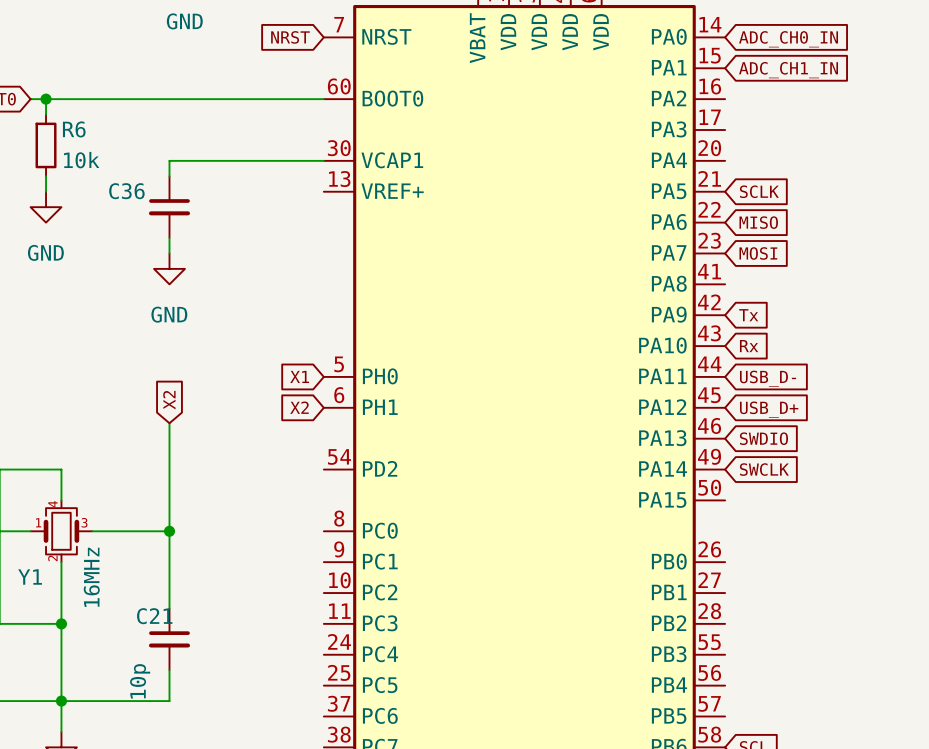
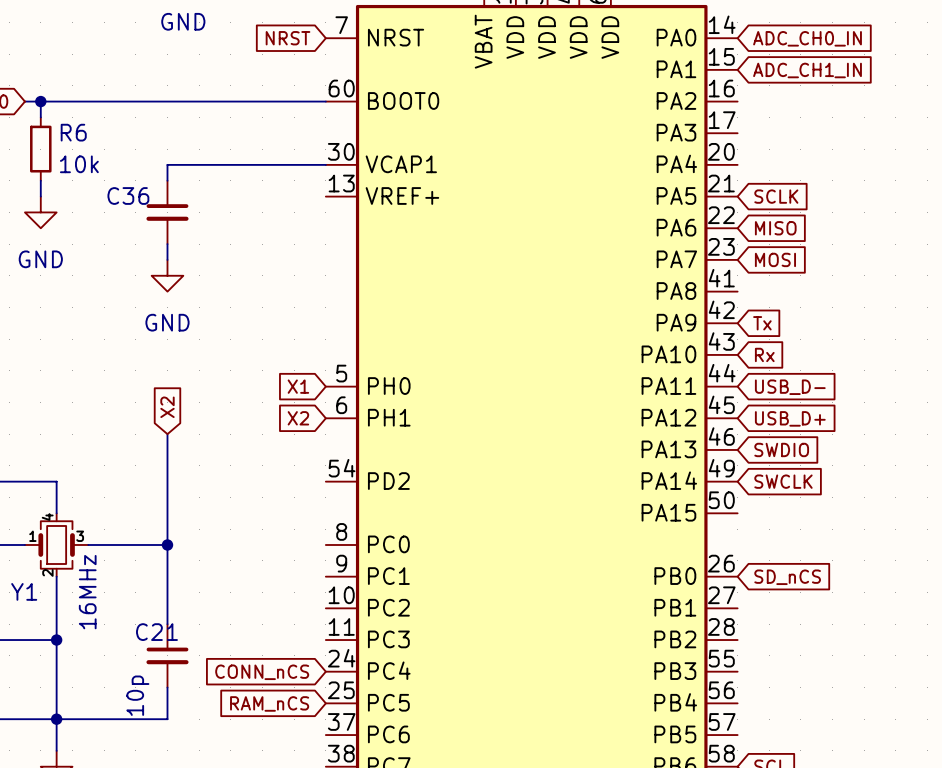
global label: none -> SD_nCS (787, 577)
global label: none -> CONN_nCS (262, 672)
global label: none -> RAM_nCS (269, 703)

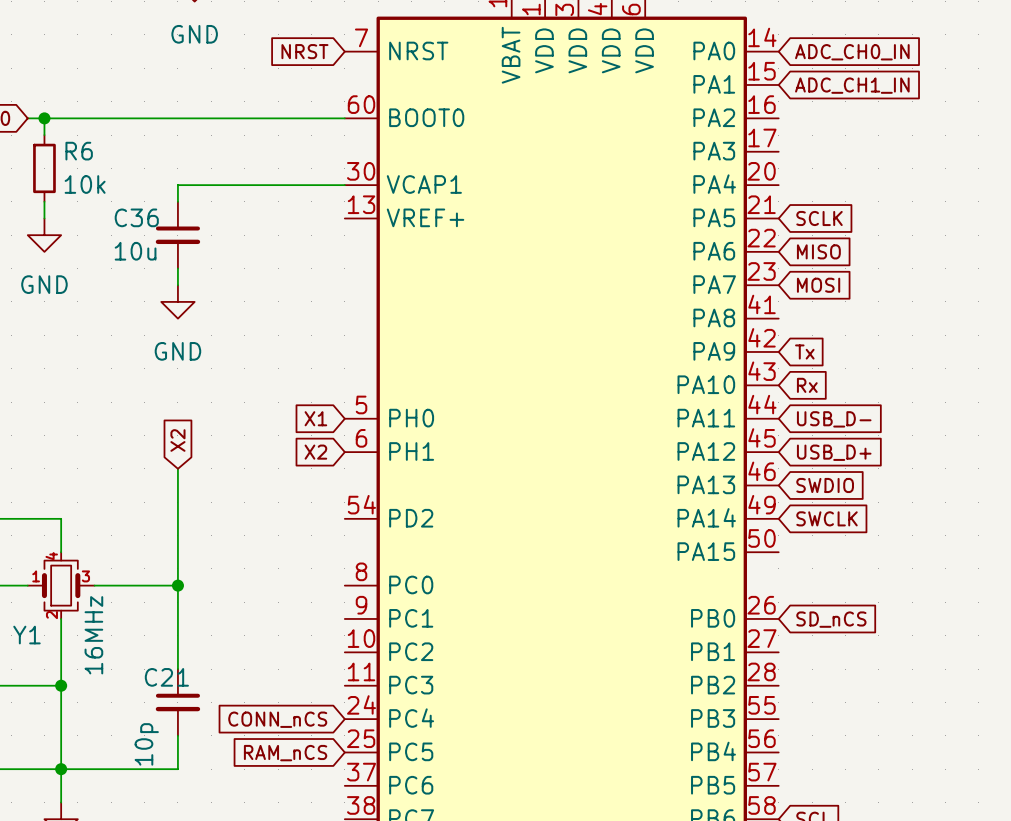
C36 value: none -> 10u (135, 251)

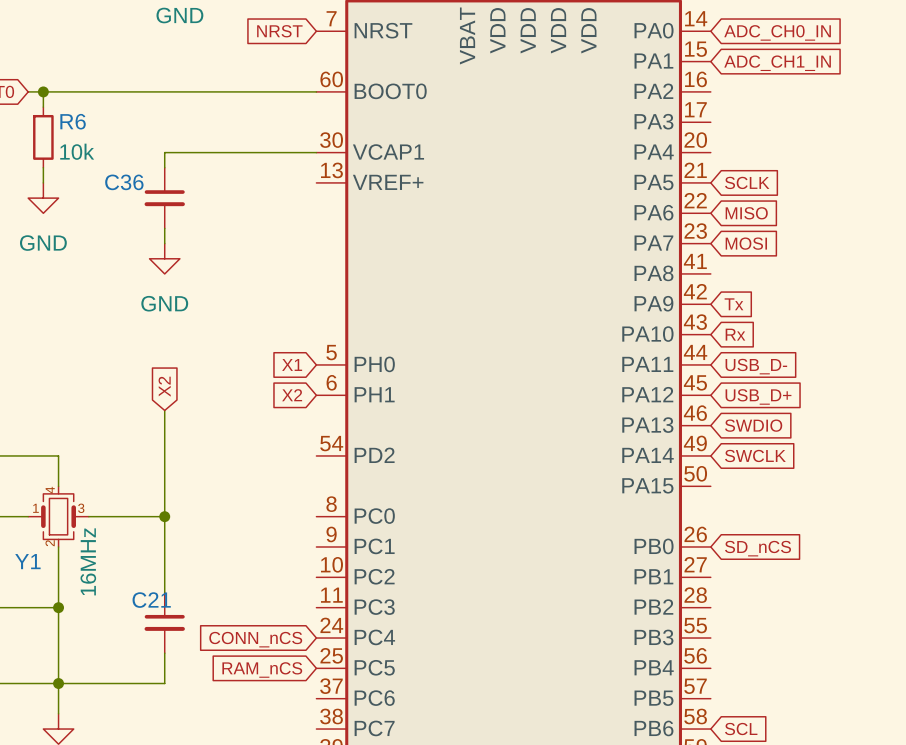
C36 value: 10u (135, 251) -> none
C21 value: 10p (146, 744) -> none

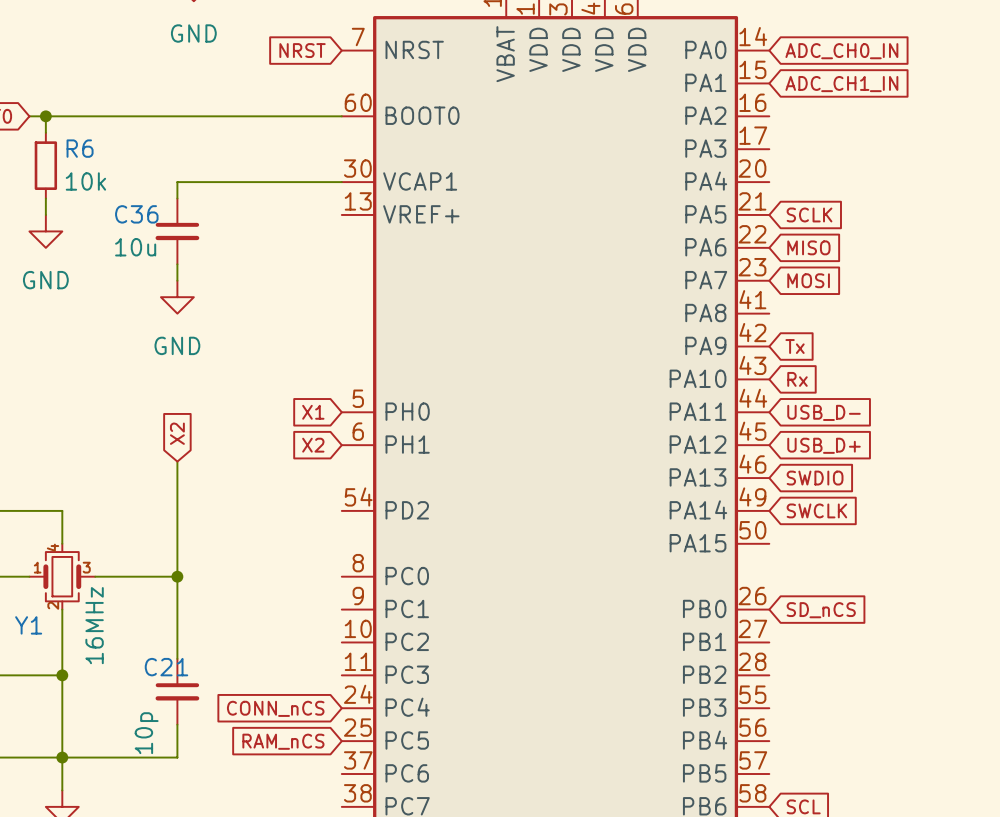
C36 value: none -> 10u (135, 247)
C21 value: none -> 10p (146, 733)

